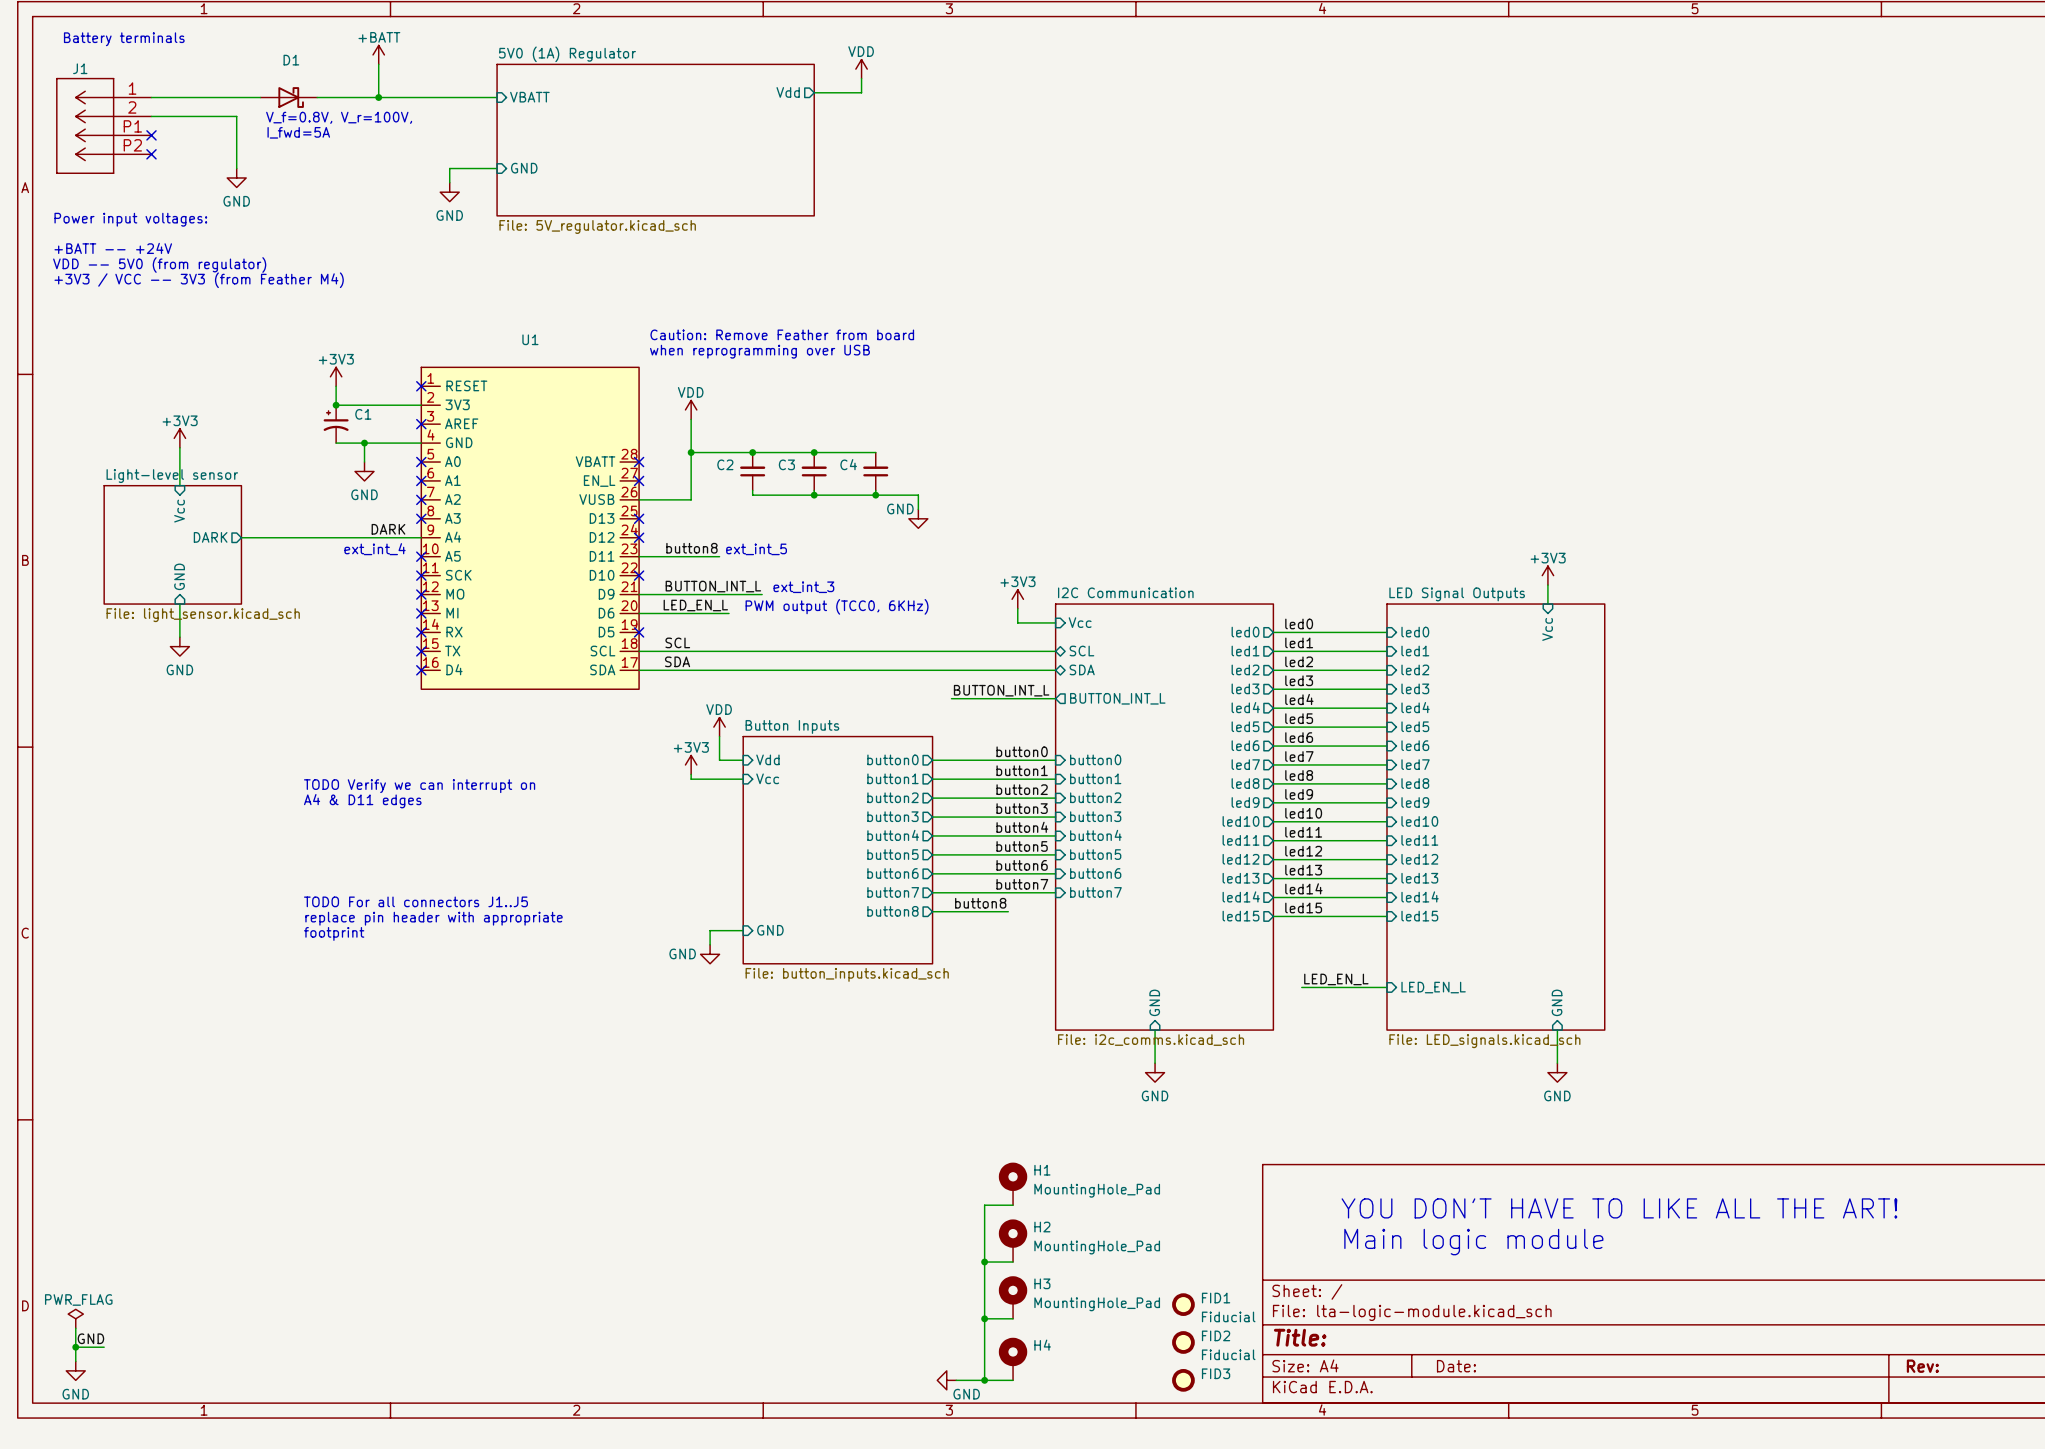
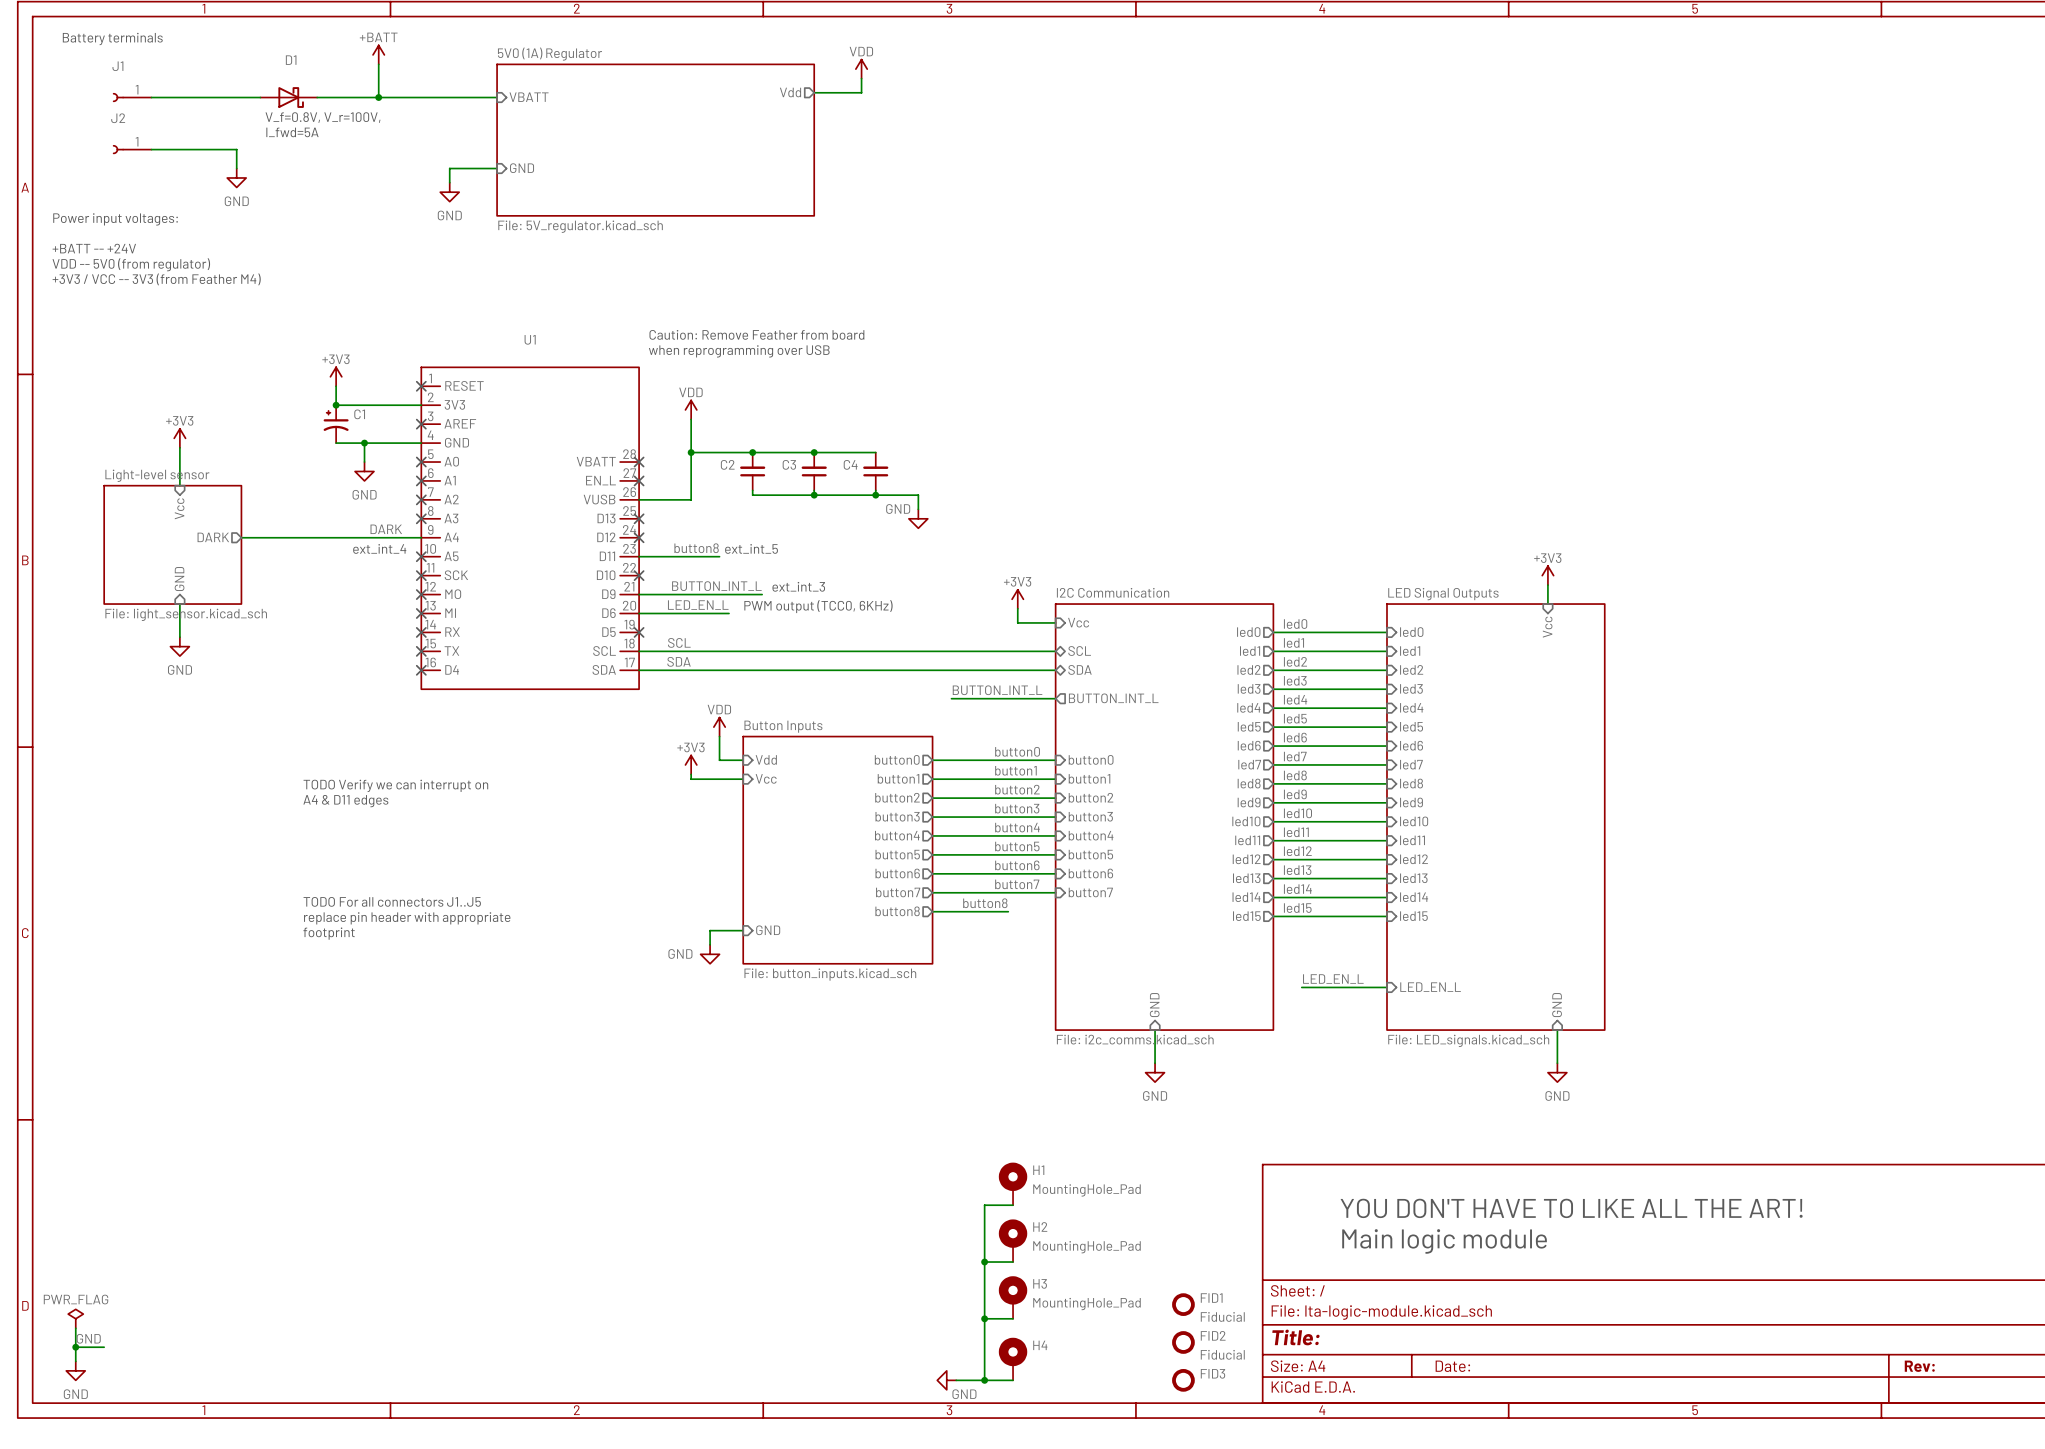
J1 name position: J1 (80, 68) -> J1 (117, 66)
J1 symbol: [56, 78, 152, 174] -> [113, 93, 152, 102]
wire: (151, 116) (236, 116) (236, 149) -> (151, 149) (236, 149)
no-connect mark: (151, 135) -> none
J2: none -> (132, 149)
no-connect mark: (151, 154) -> none

